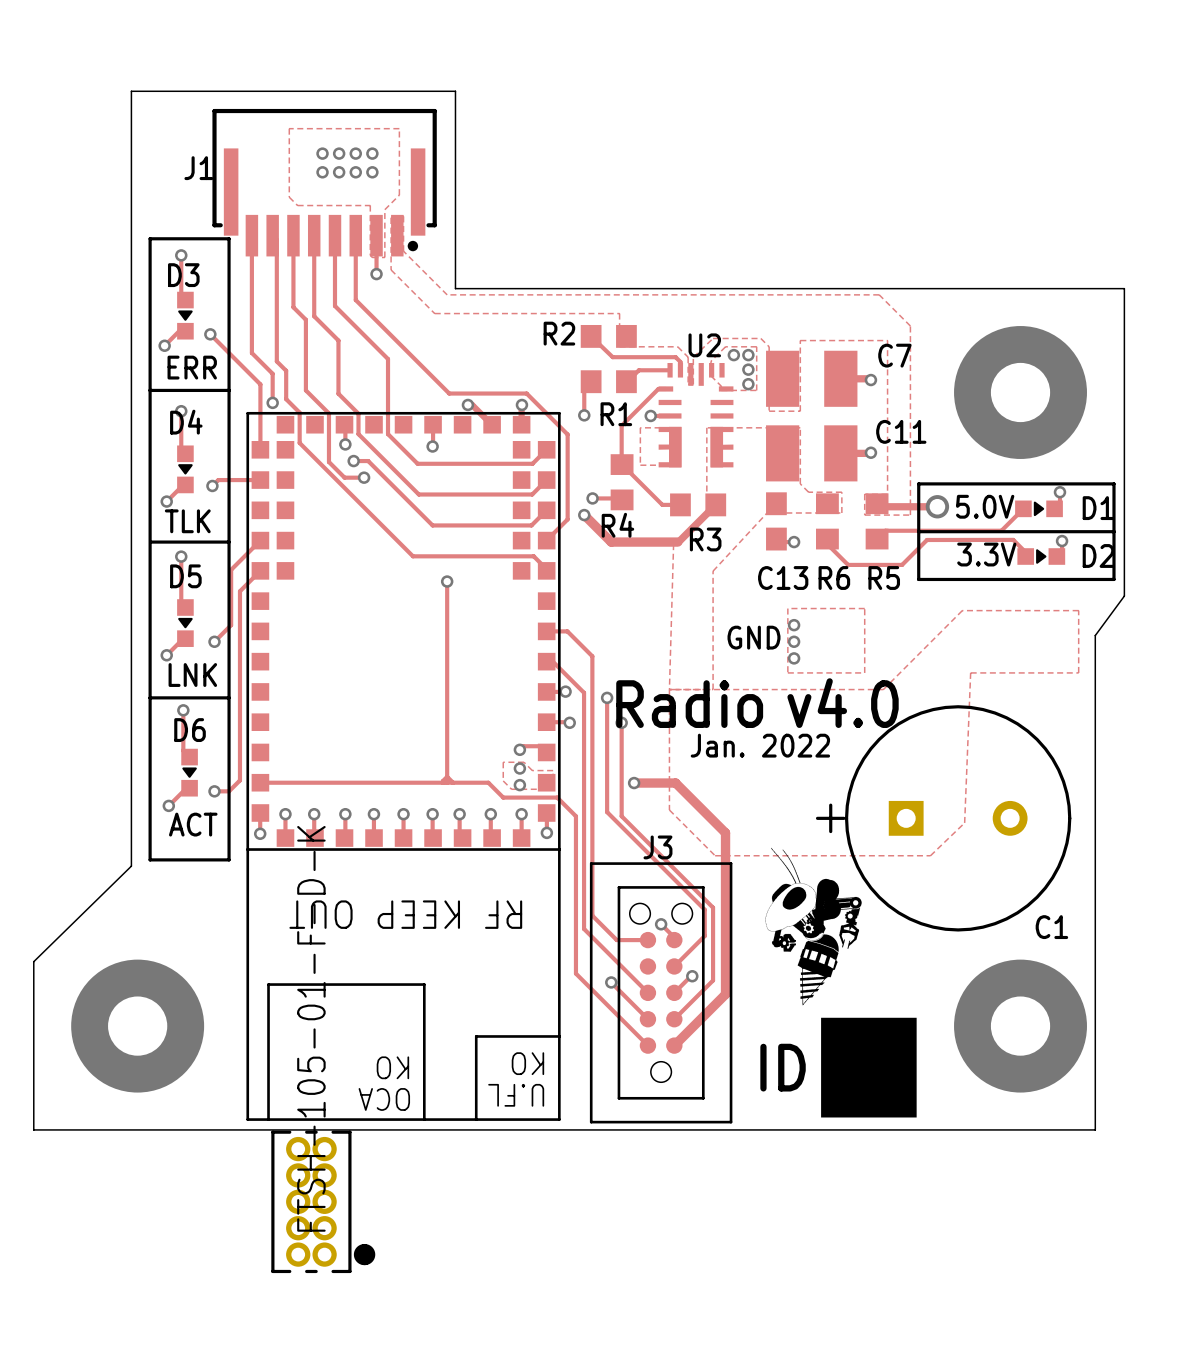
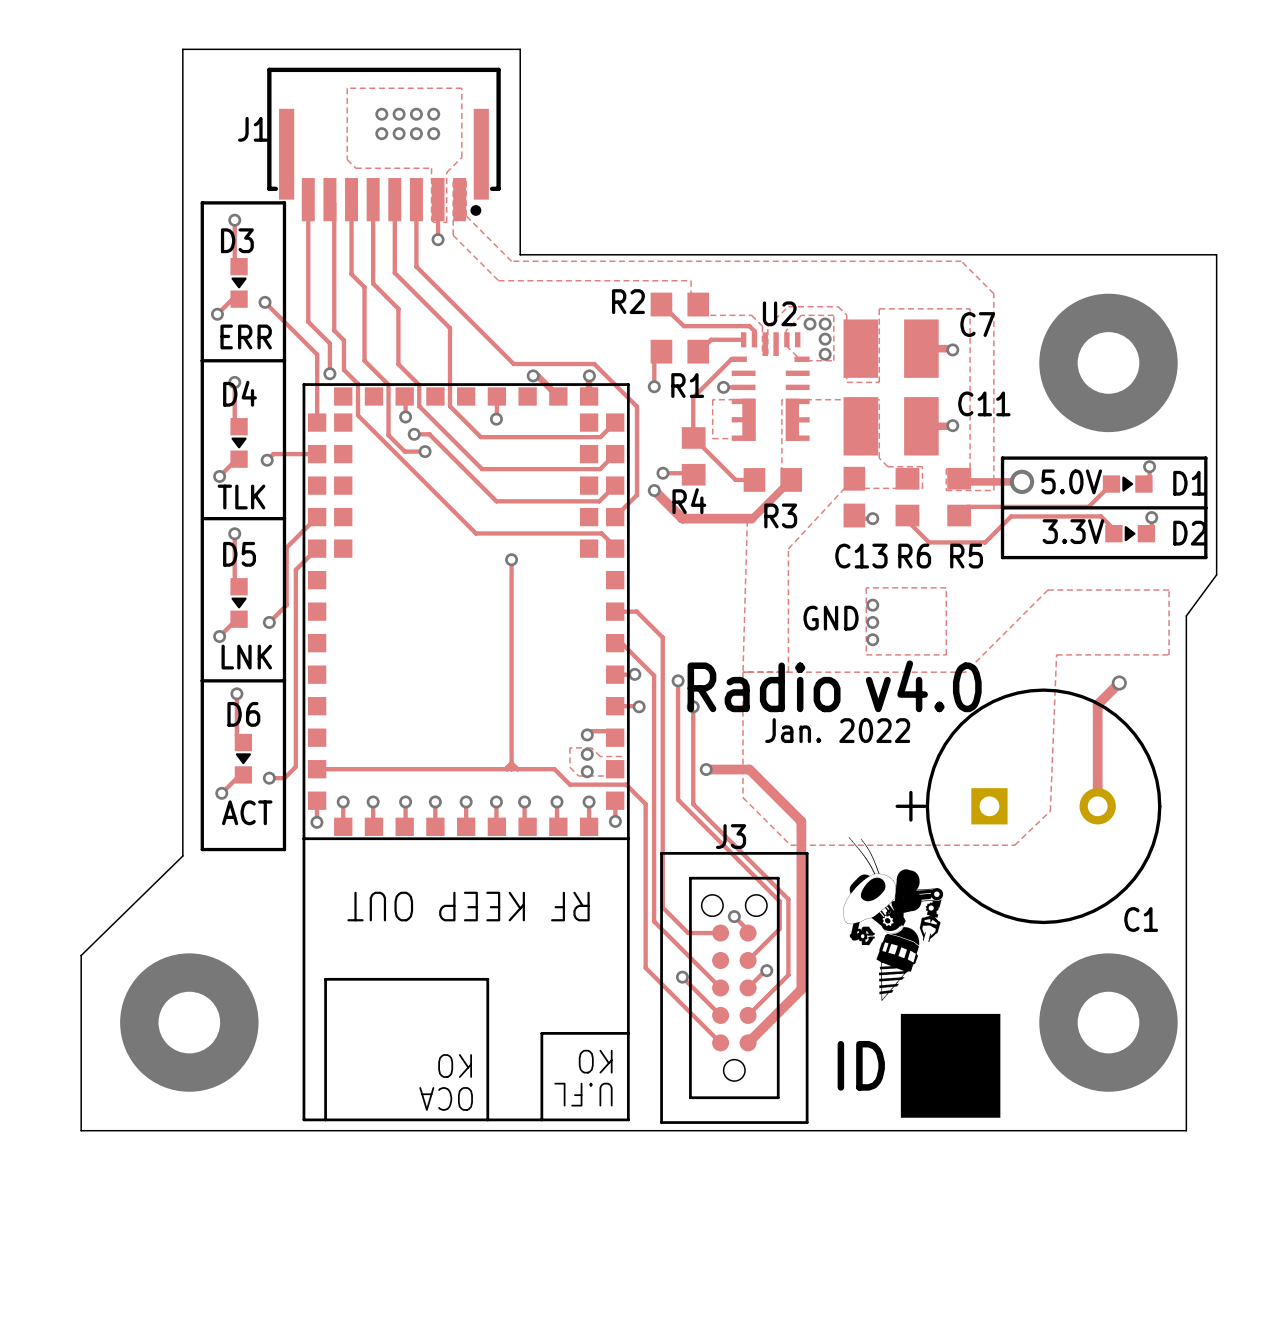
track: none -> (1119, 683) (1097, 704) (1097, 806)
via: none -> (1119, 683)
part: FTSH-105-01-F-D-K (323, 1201) -> none

